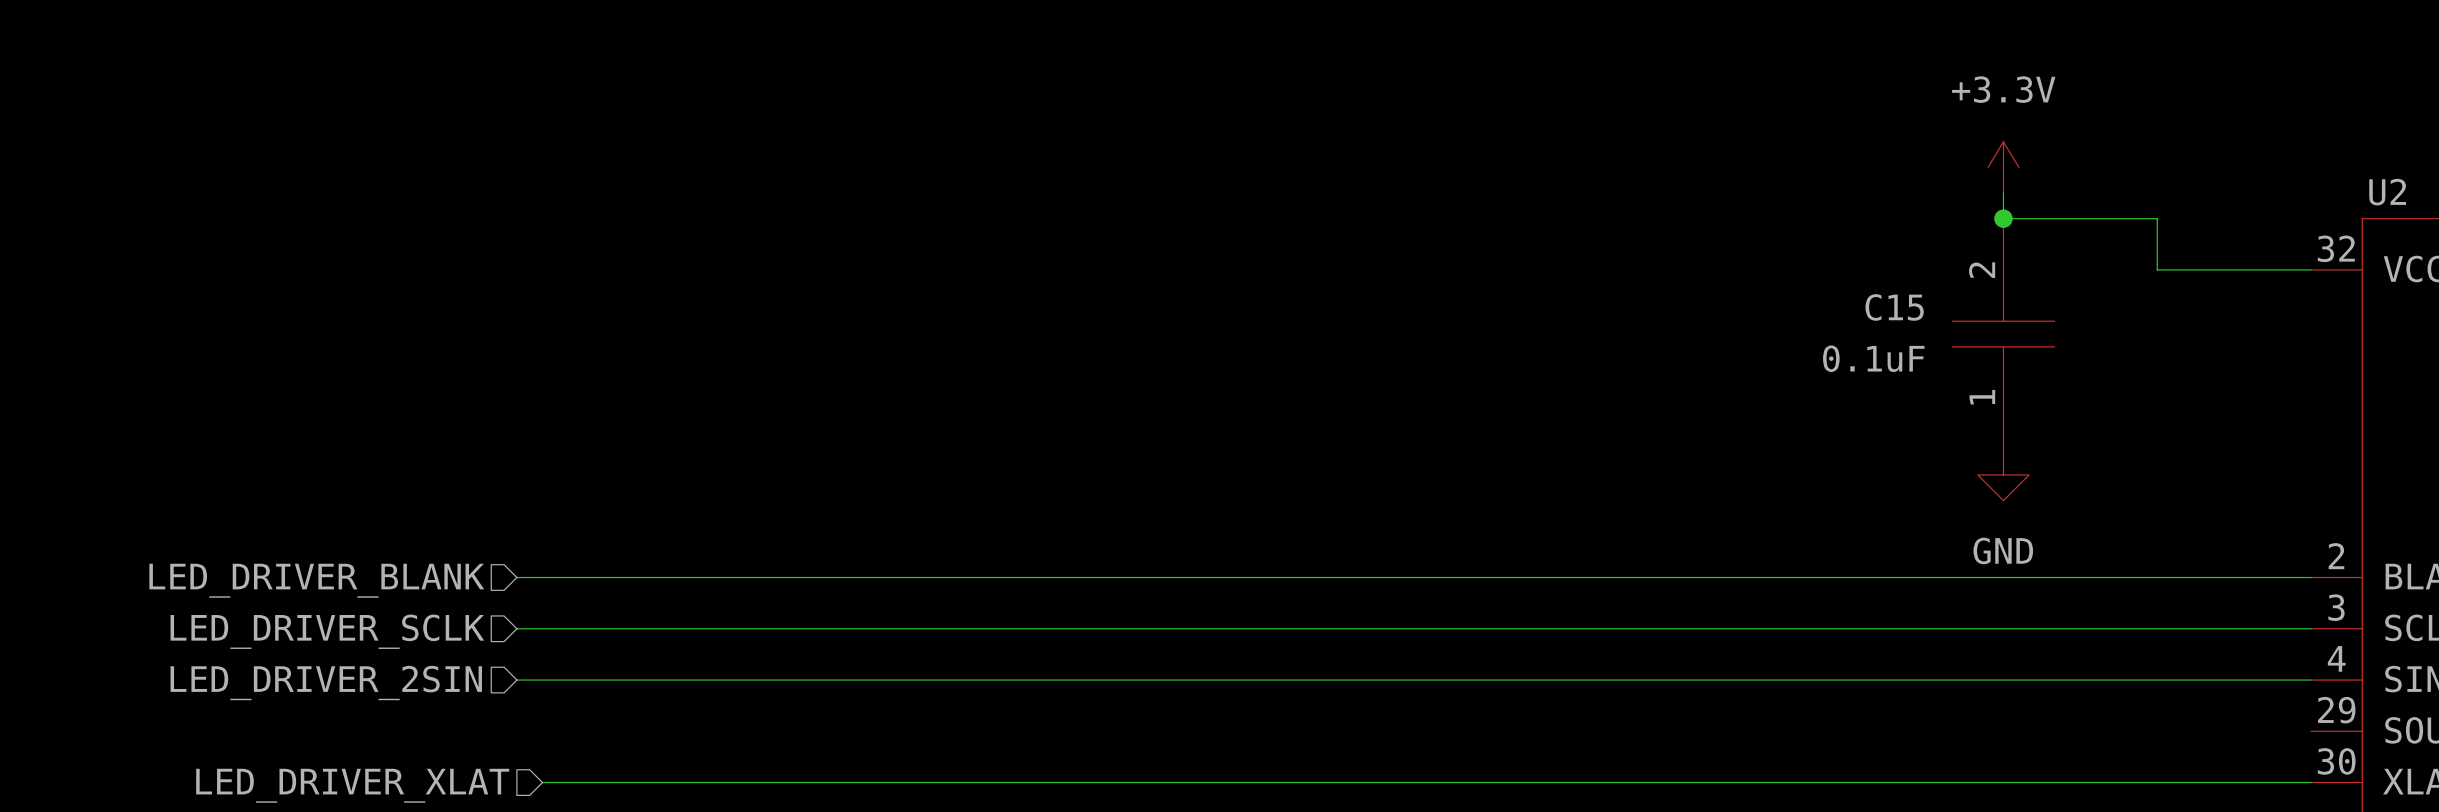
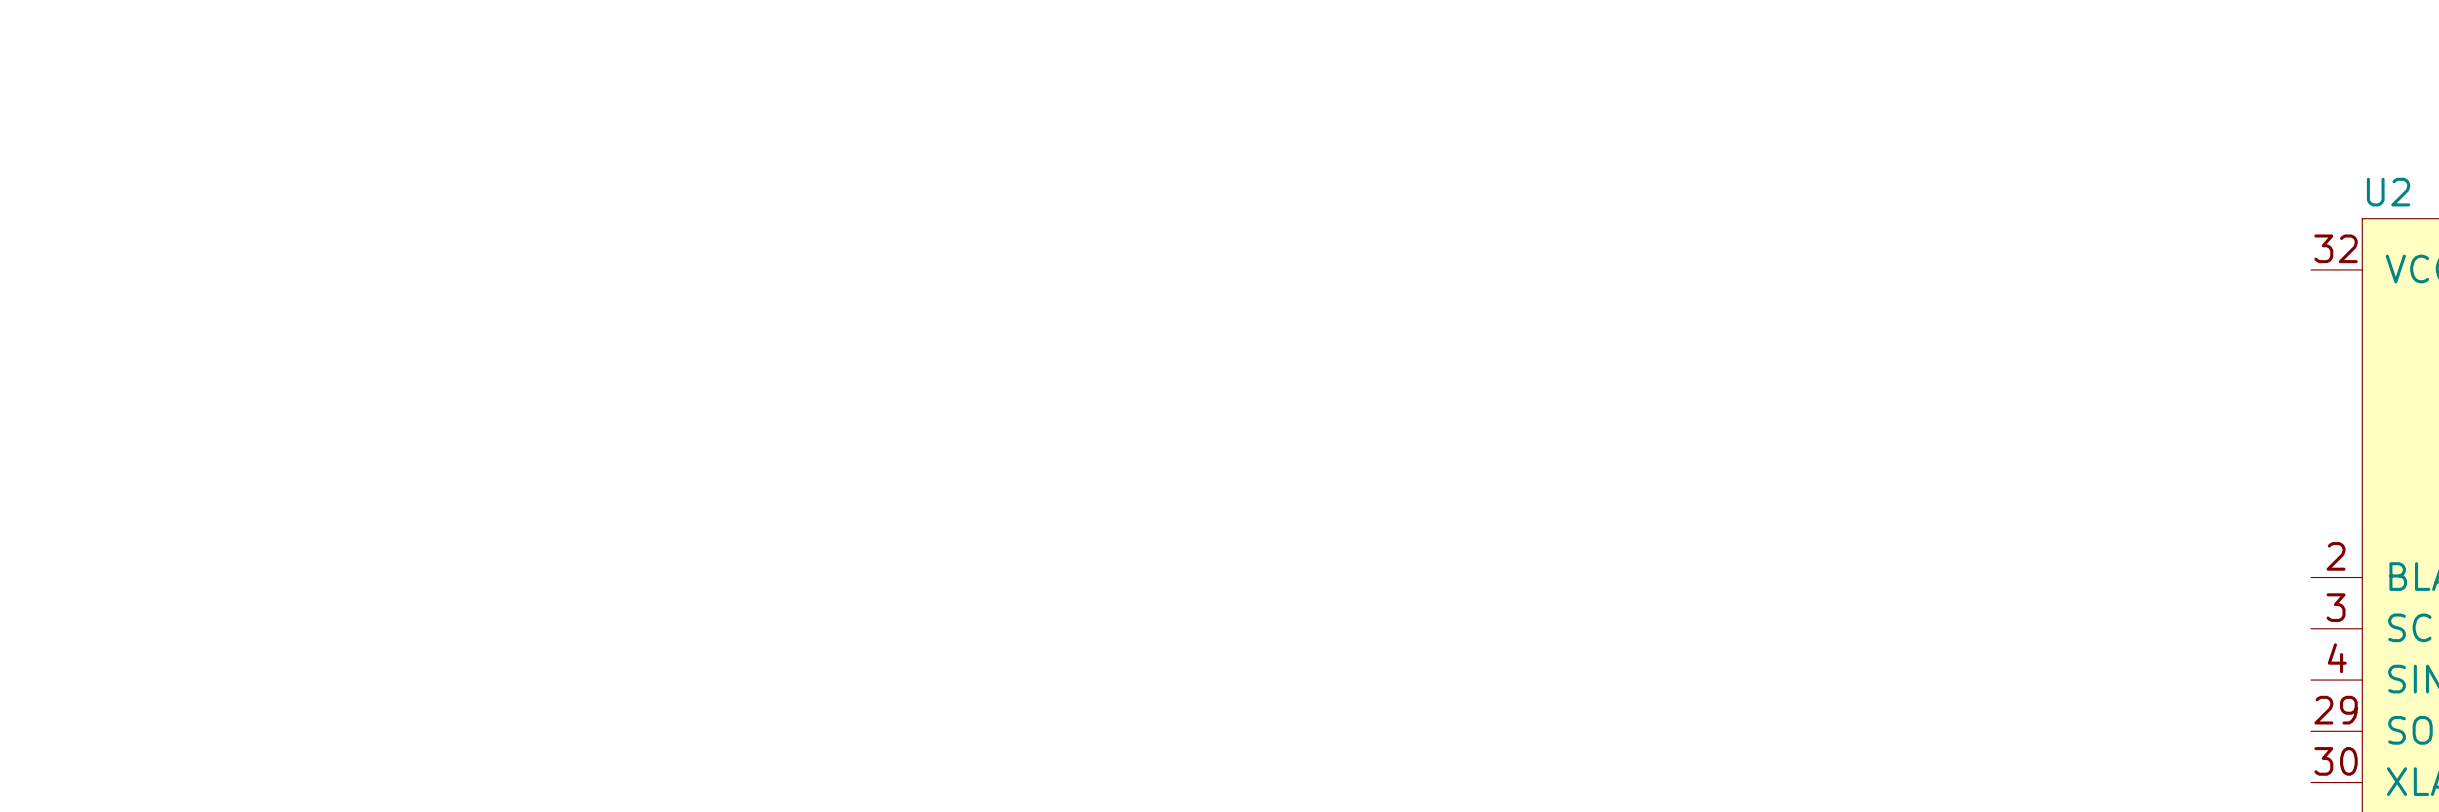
power symbol: +3.3V (2003, 167) -> none
wire: (2003, 193) (2003, 218) (2157, 218) (2157, 269) (2311, 269) -> none
junction: (2003, 218) -> none
C15: (2003, 334) -> none
power symbol: GND (2003, 474) -> none
wire: (516, 577) (2311, 577) -> none
hierarchical label: LED_DRIVER_BLANK (316, 580) -> none
wire: (516, 628) (2311, 628) -> none
hierarchical label: LED_DRIVER_SCLK (327, 631) -> none
wire: (516, 680) (2311, 680) -> none
hierarchical label: LED_DRIVER_2SIN (326, 682) -> none
wire: (542, 782) (2311, 782) -> none
hierarchical label: LED_DRIVER_XLAT (352, 785) -> none

